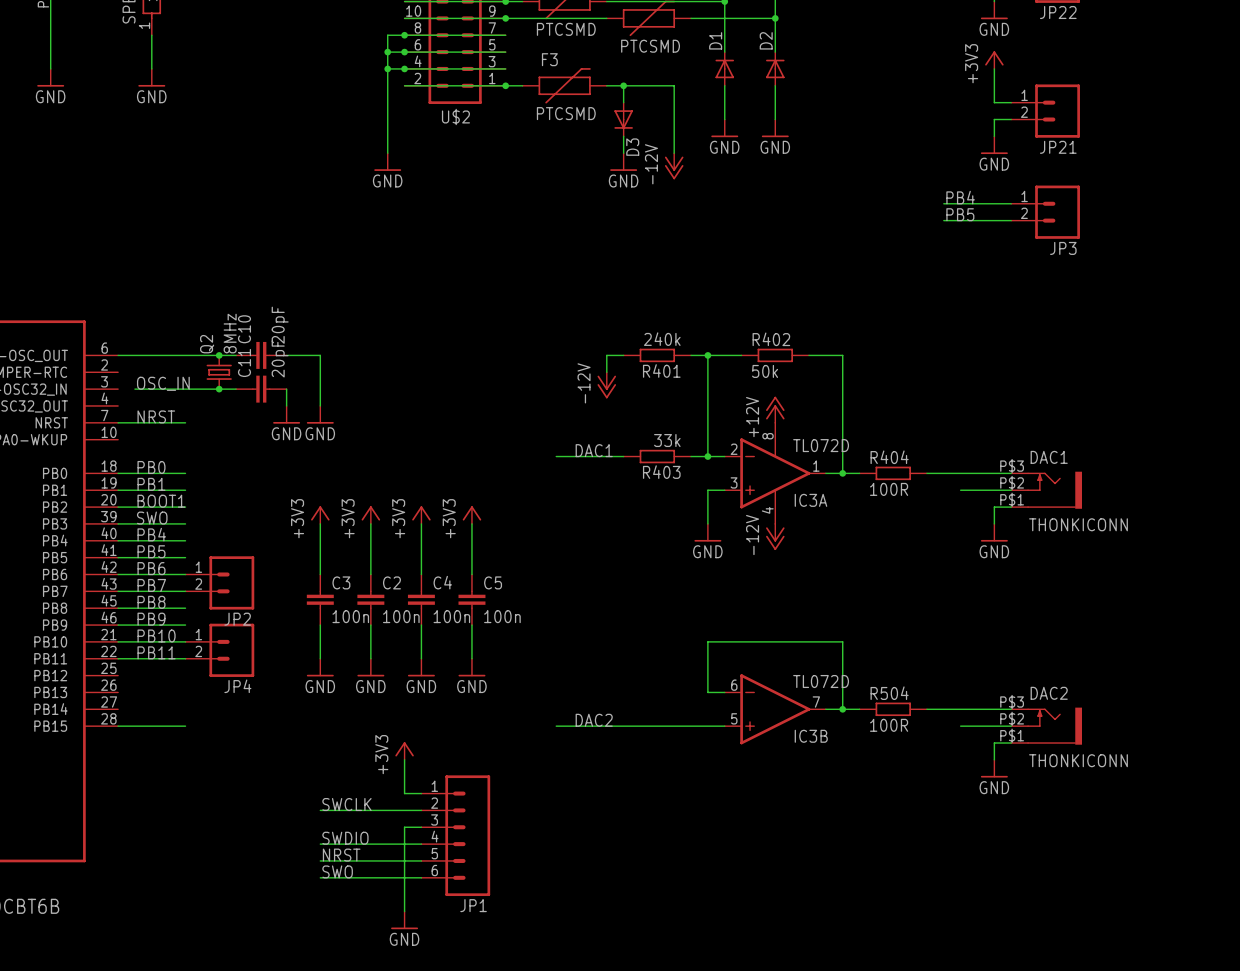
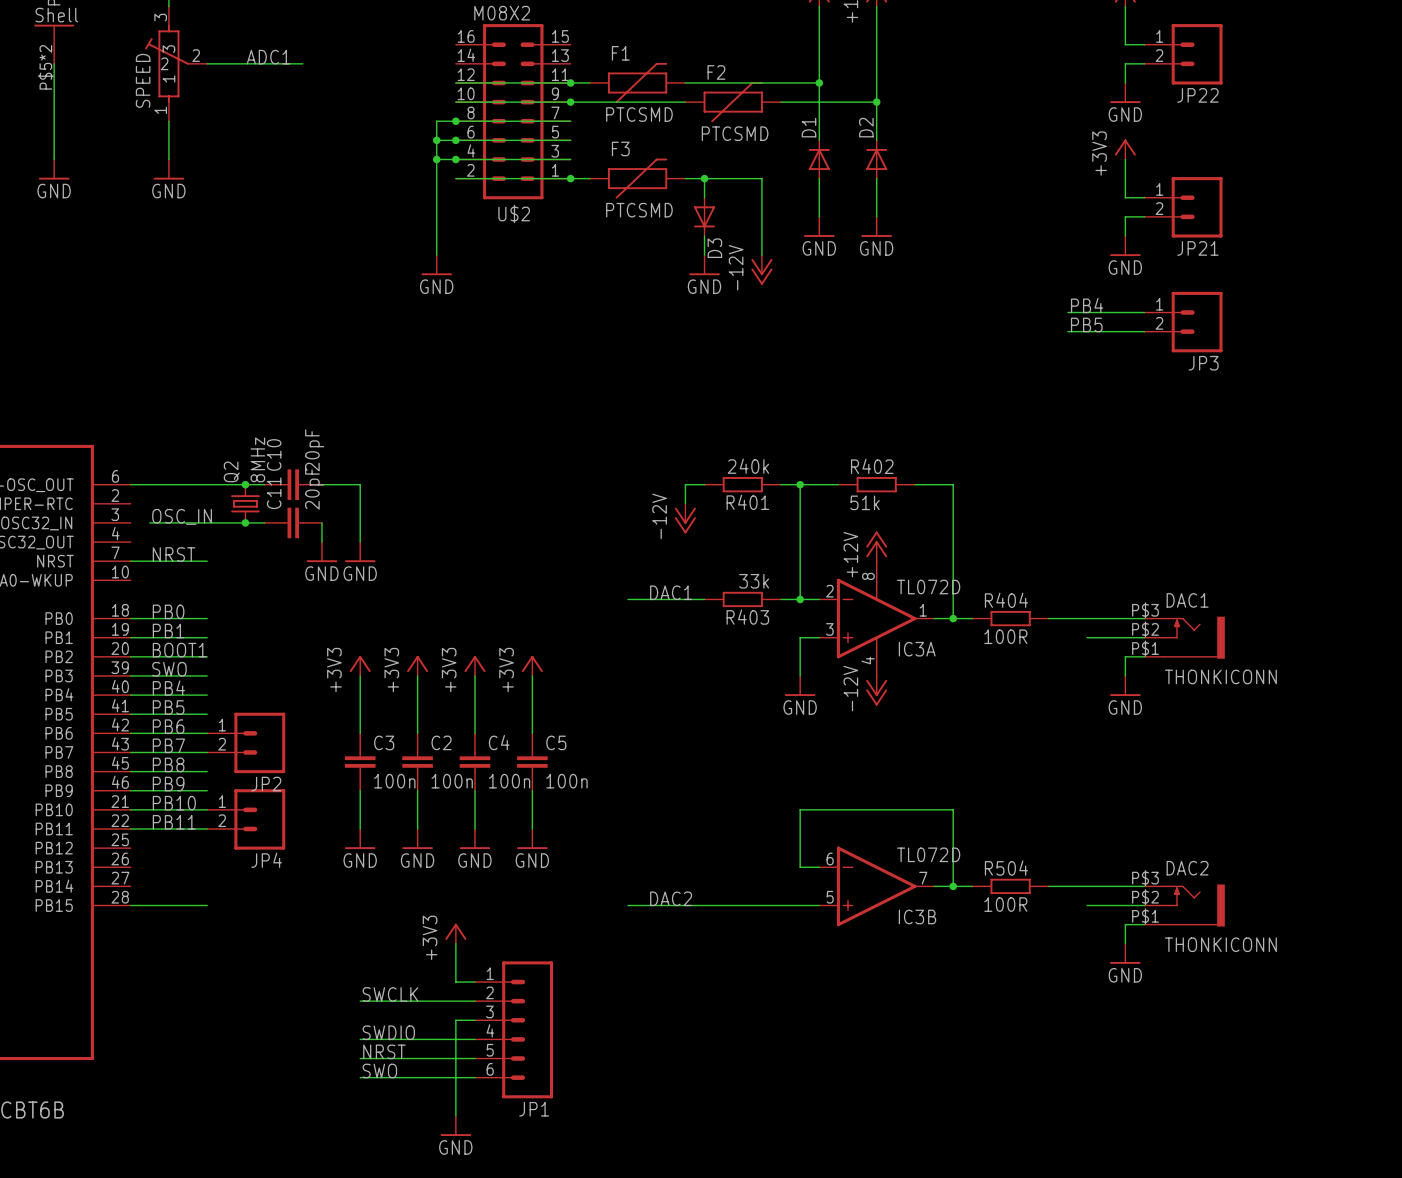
R402 value: 50k (765, 371) -> 51k (865, 502)

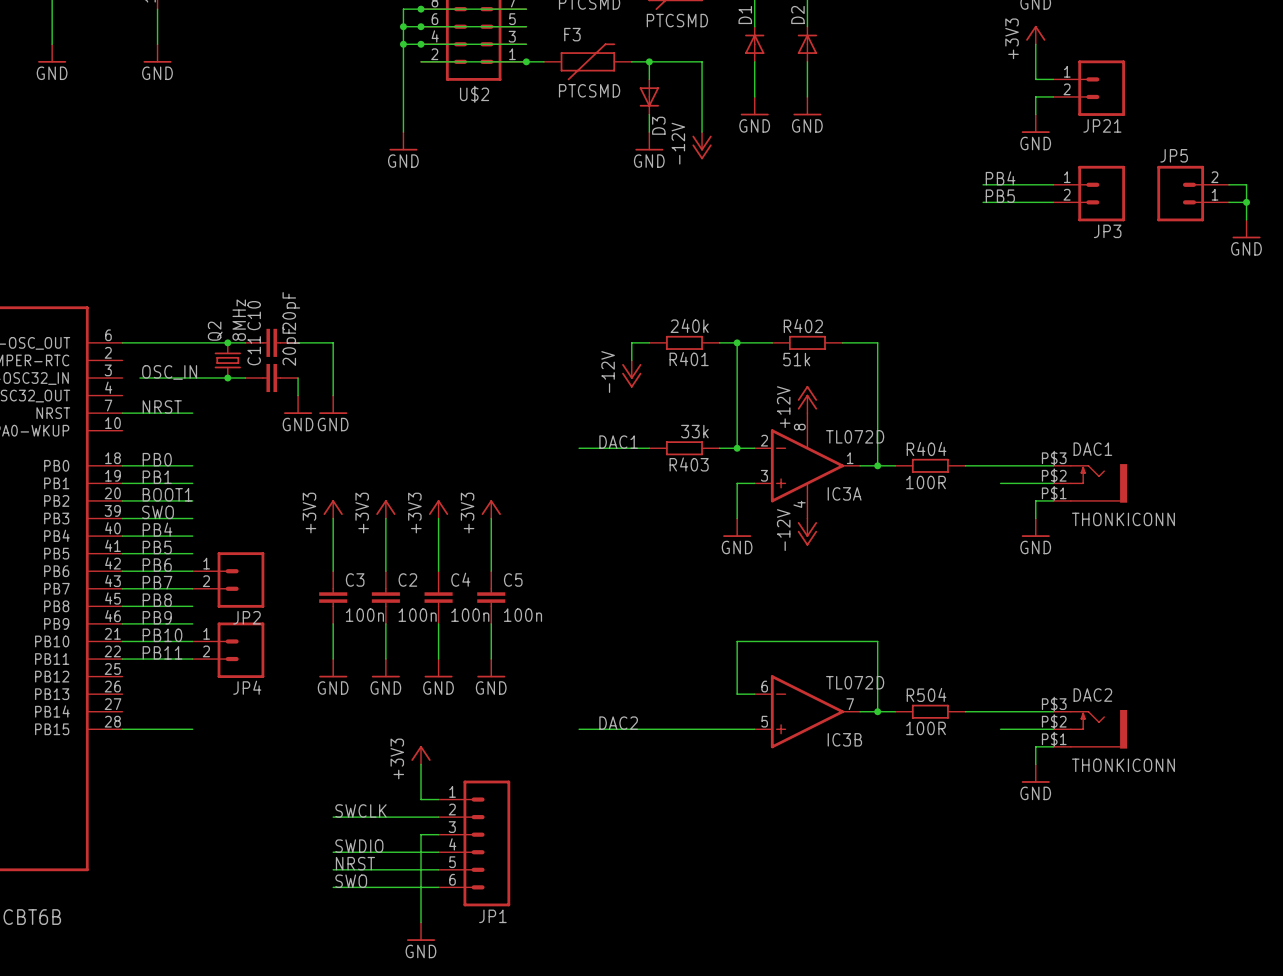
wire: none -> (1228, 184) (1246, 184) (1246, 219)
JP5: none -> (1193, 193)
wire: none -> (1228, 202) (1246, 202)
junction: none -> (1246, 202)
power symbol: none -> GND (1246, 229)

